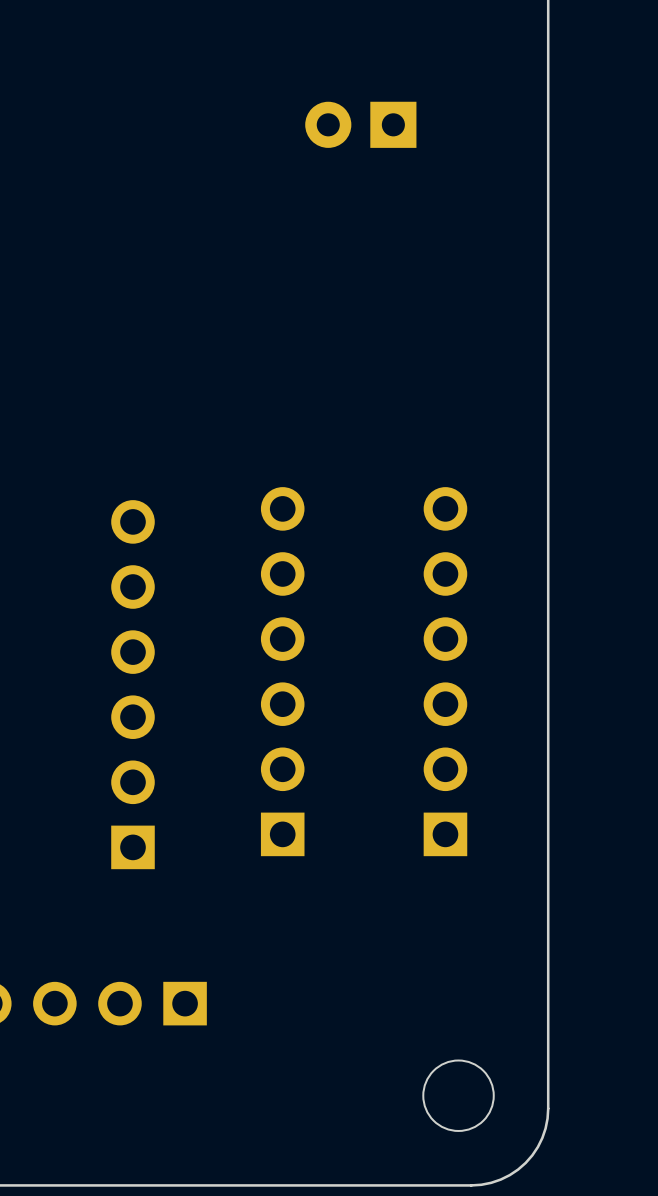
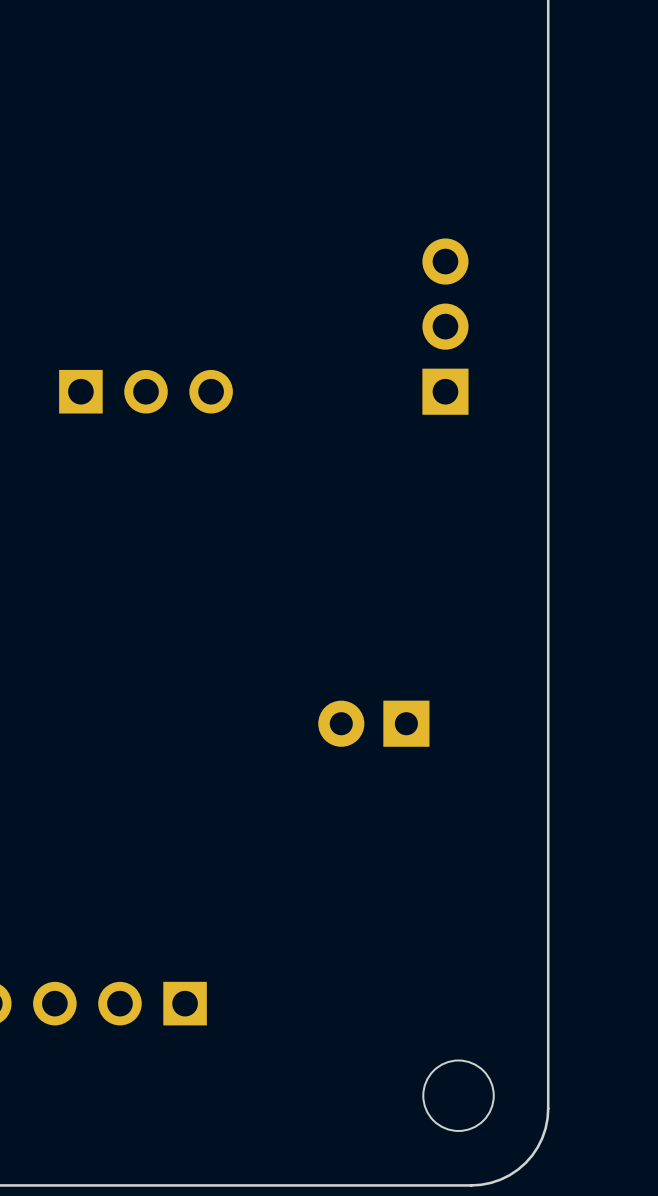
part position: (360, 124) -> (373, 723)
part: none -> (445, 326)
part: none -> (146, 391)
part: (282, 671) -> none
part: (445, 671) -> none
part: (132, 684) -> none

